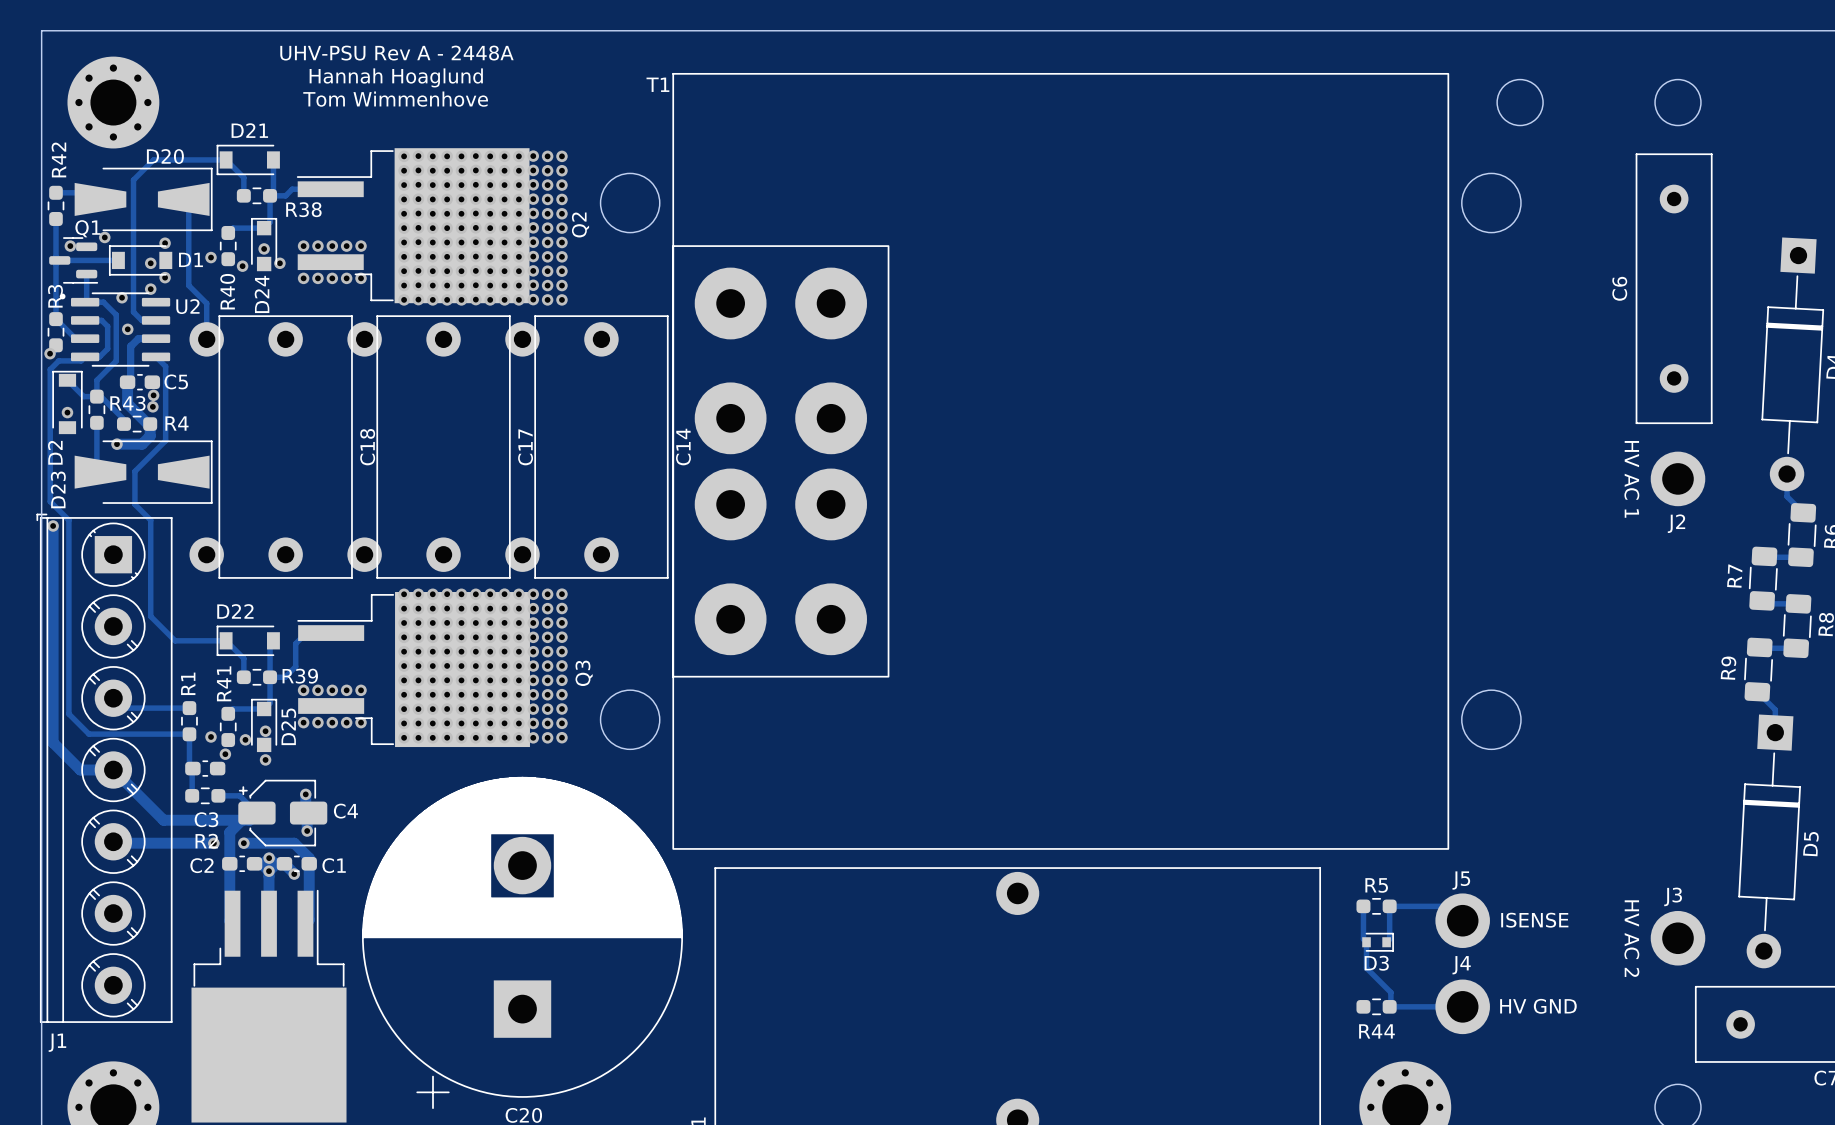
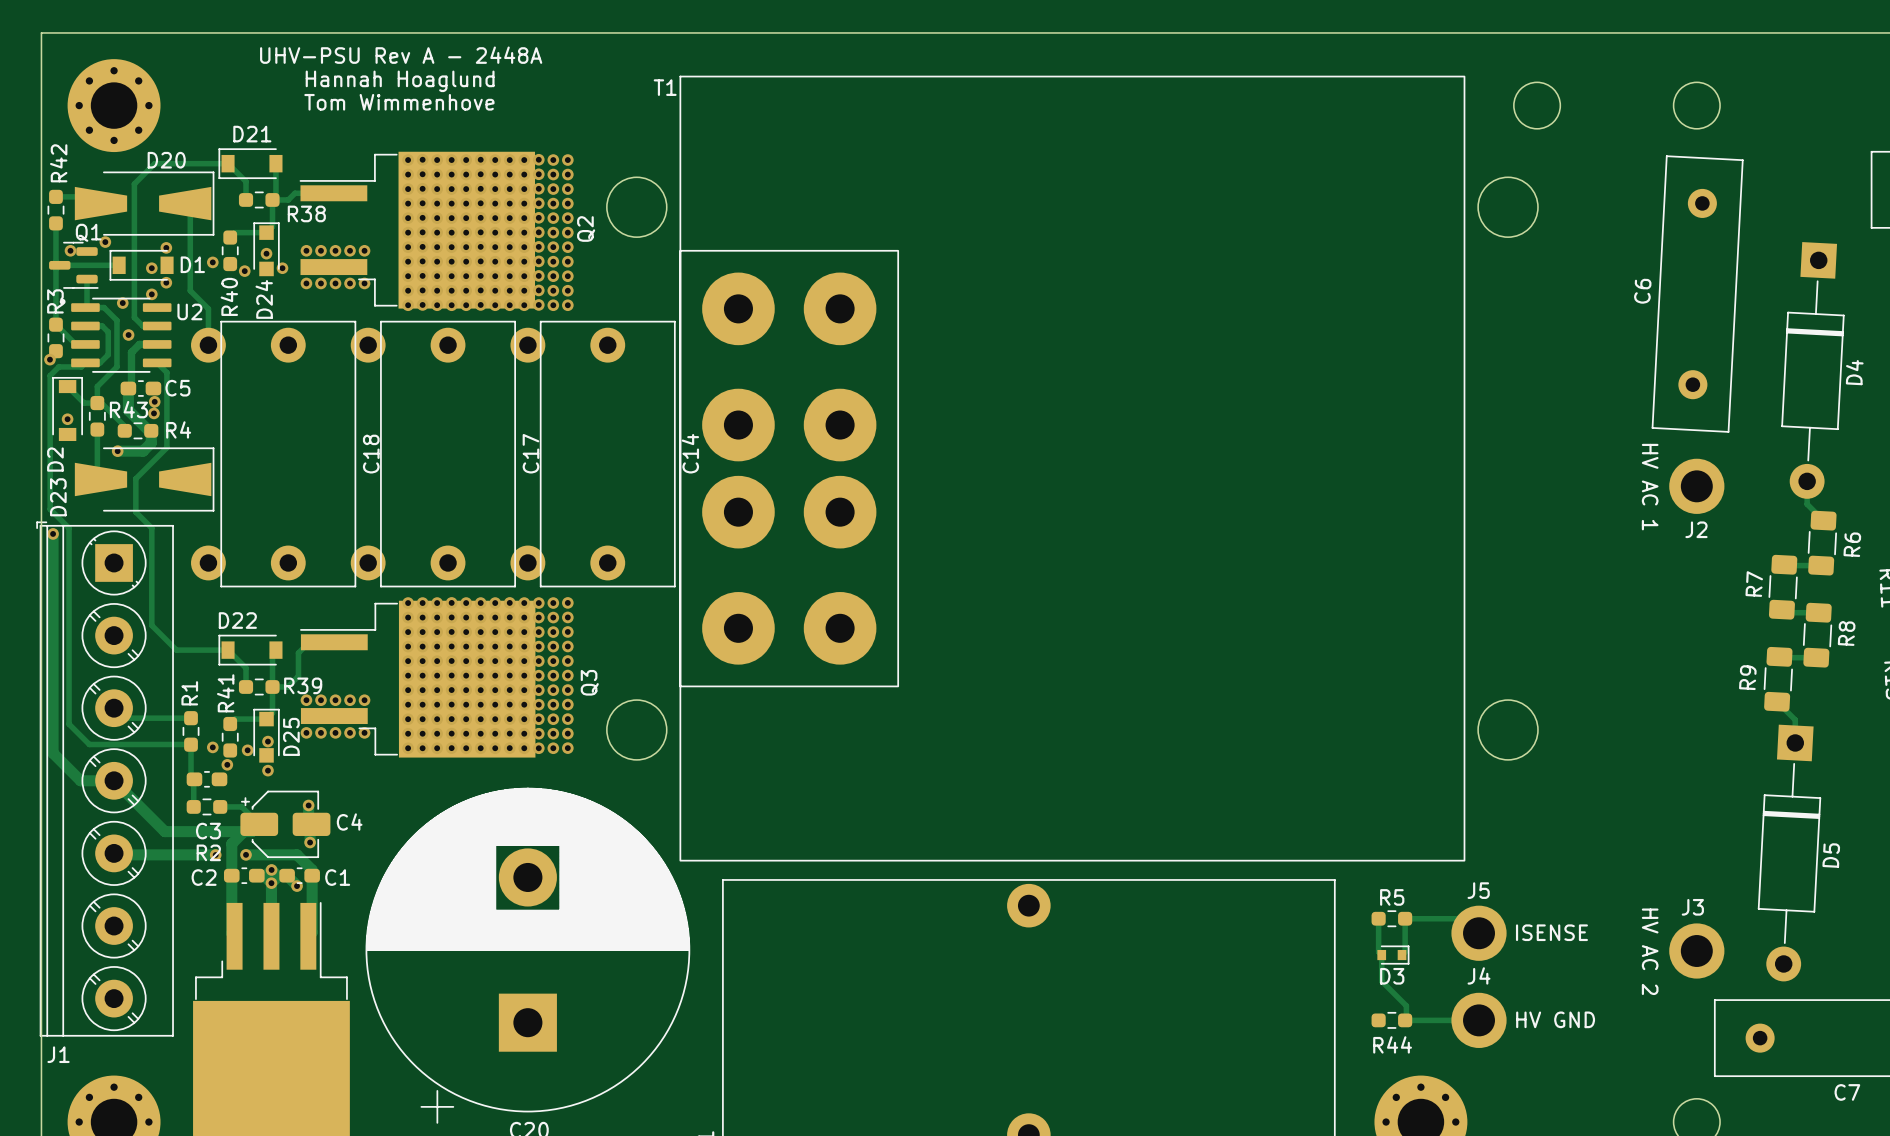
C6 rotation: 0° (1674, 288) -> 3° clockwise (1697, 294)

